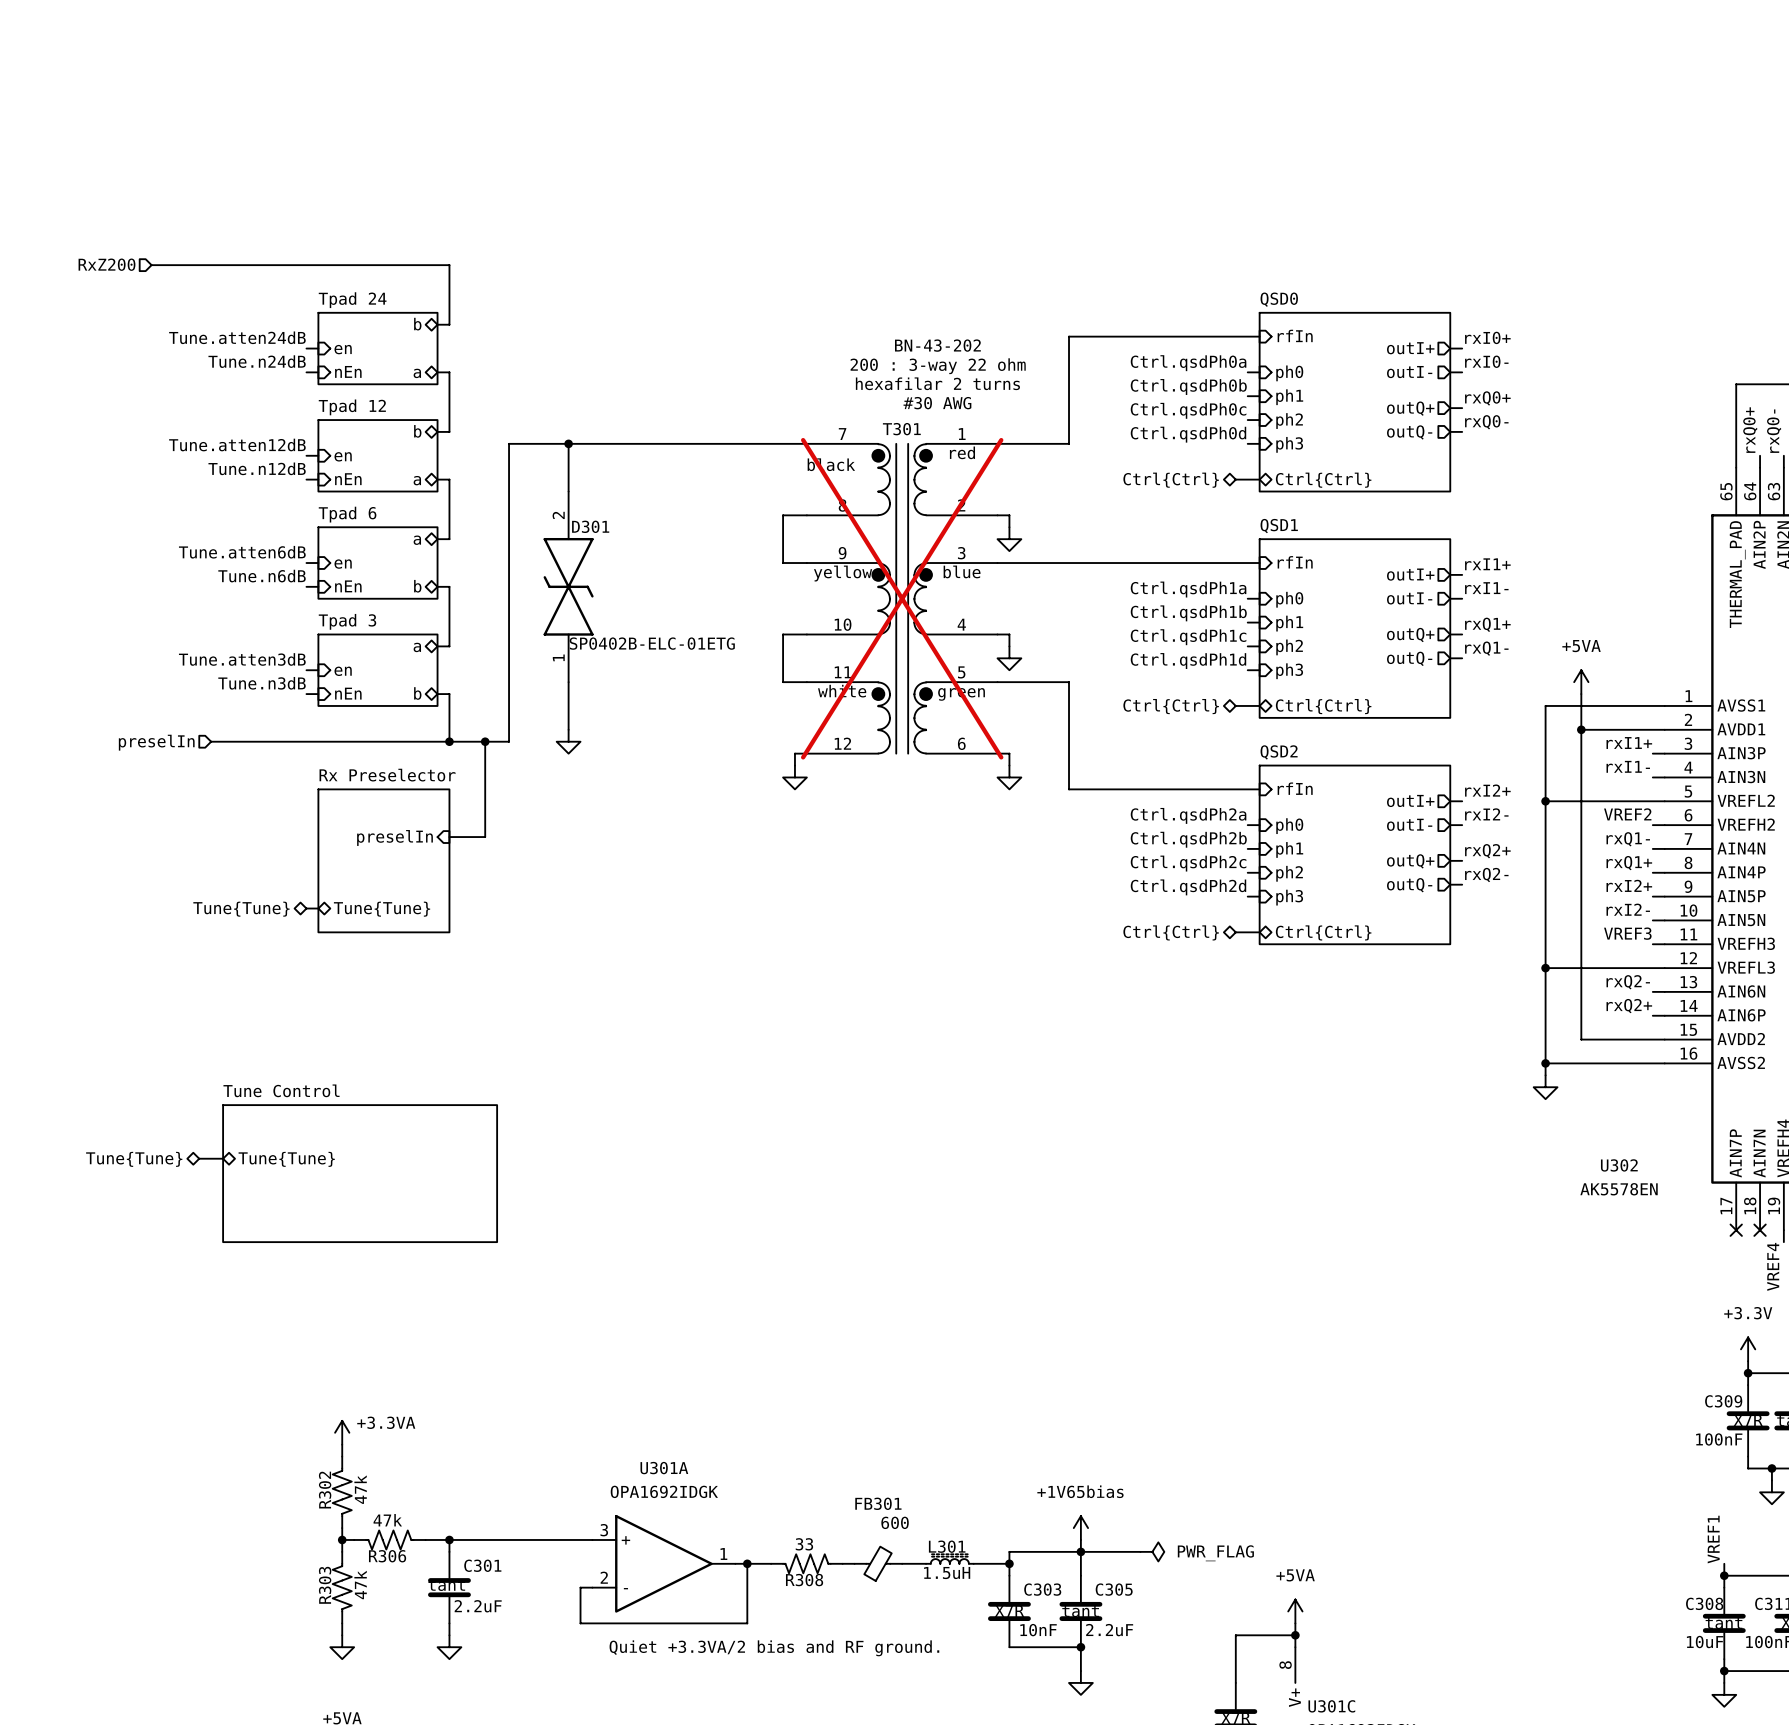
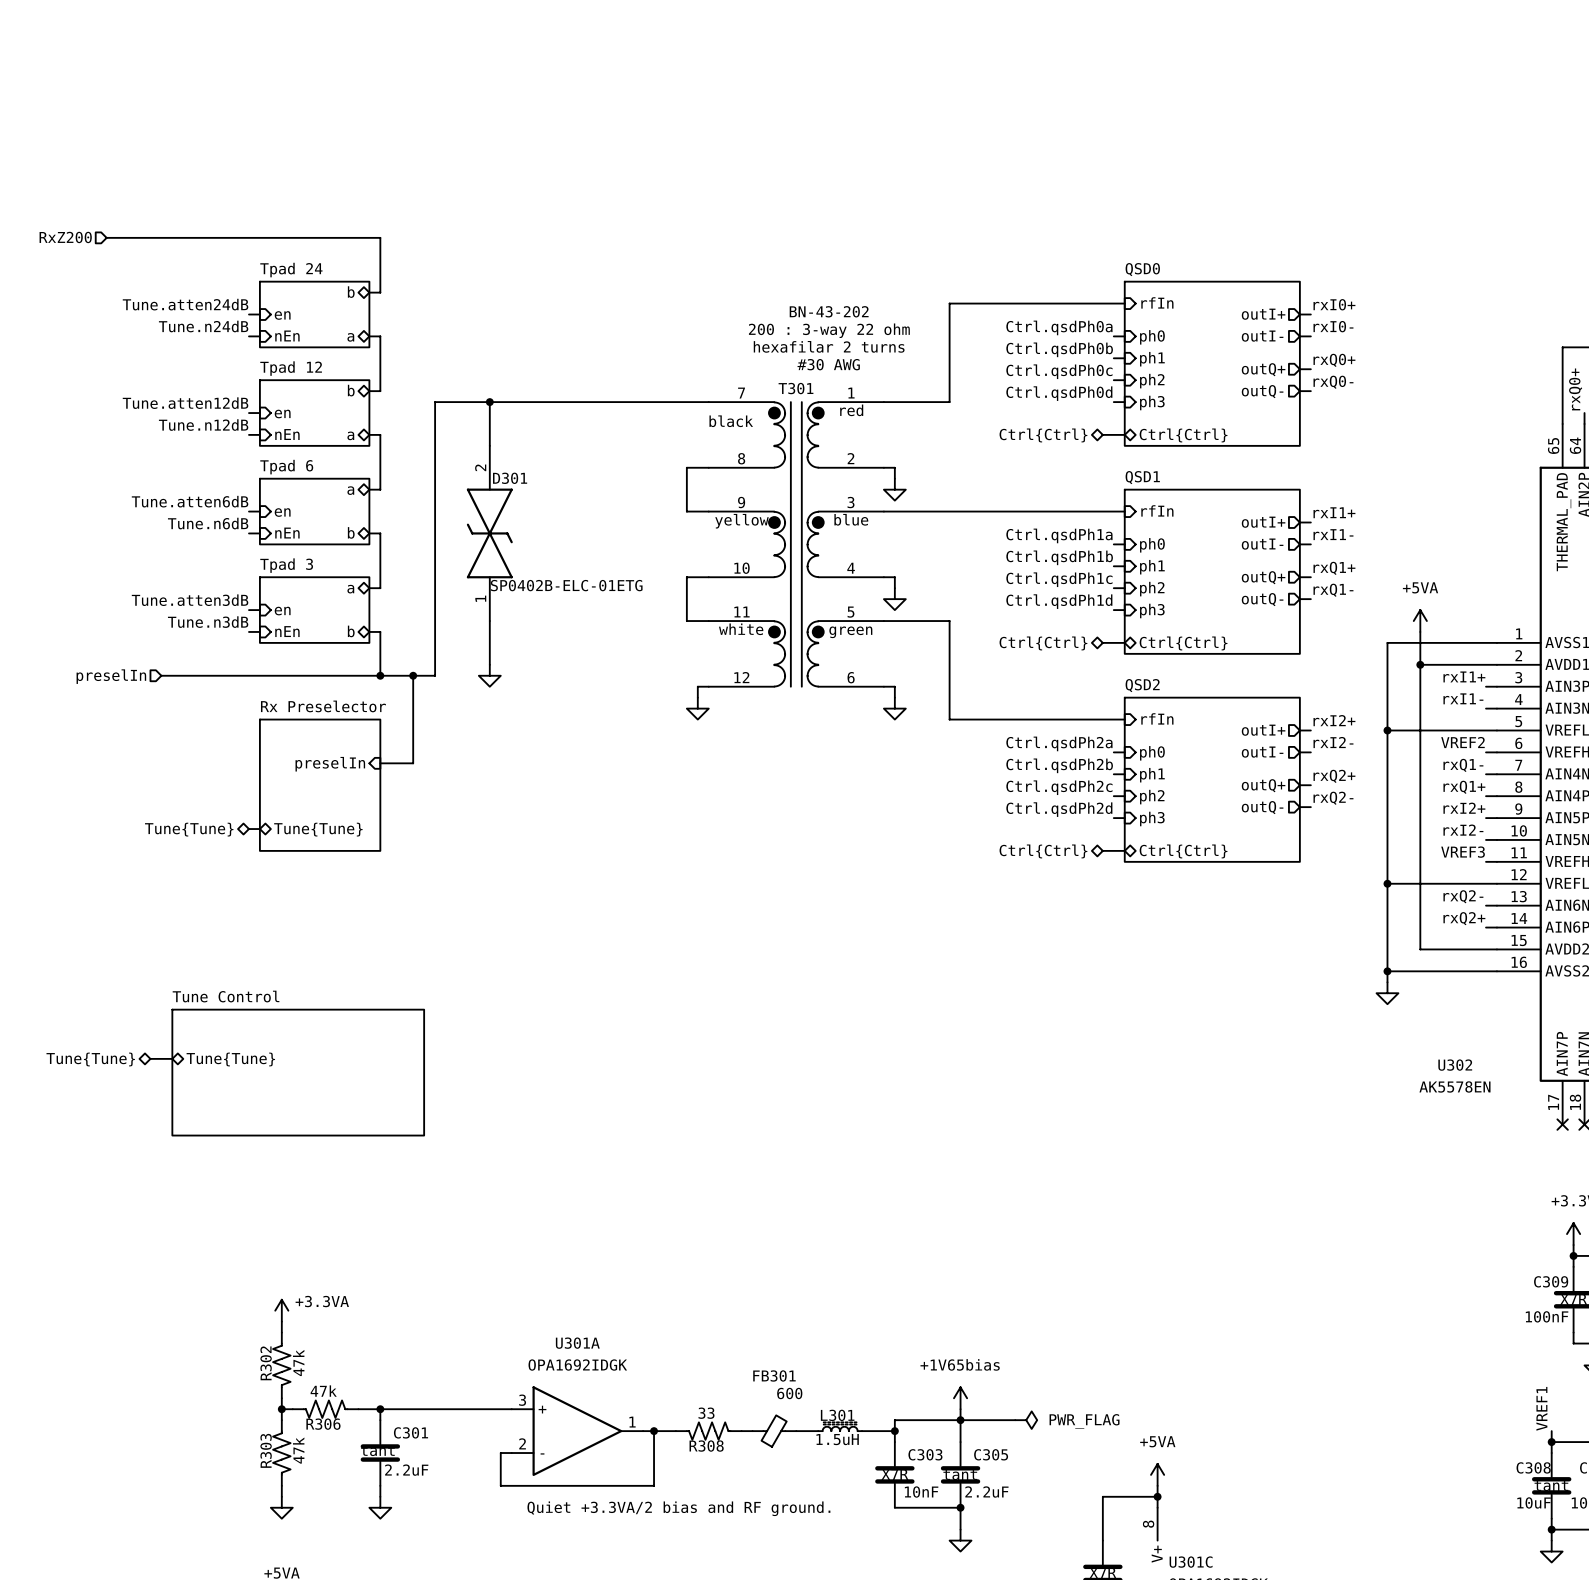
T301 do-not-place cross: (902, 598) -> none

